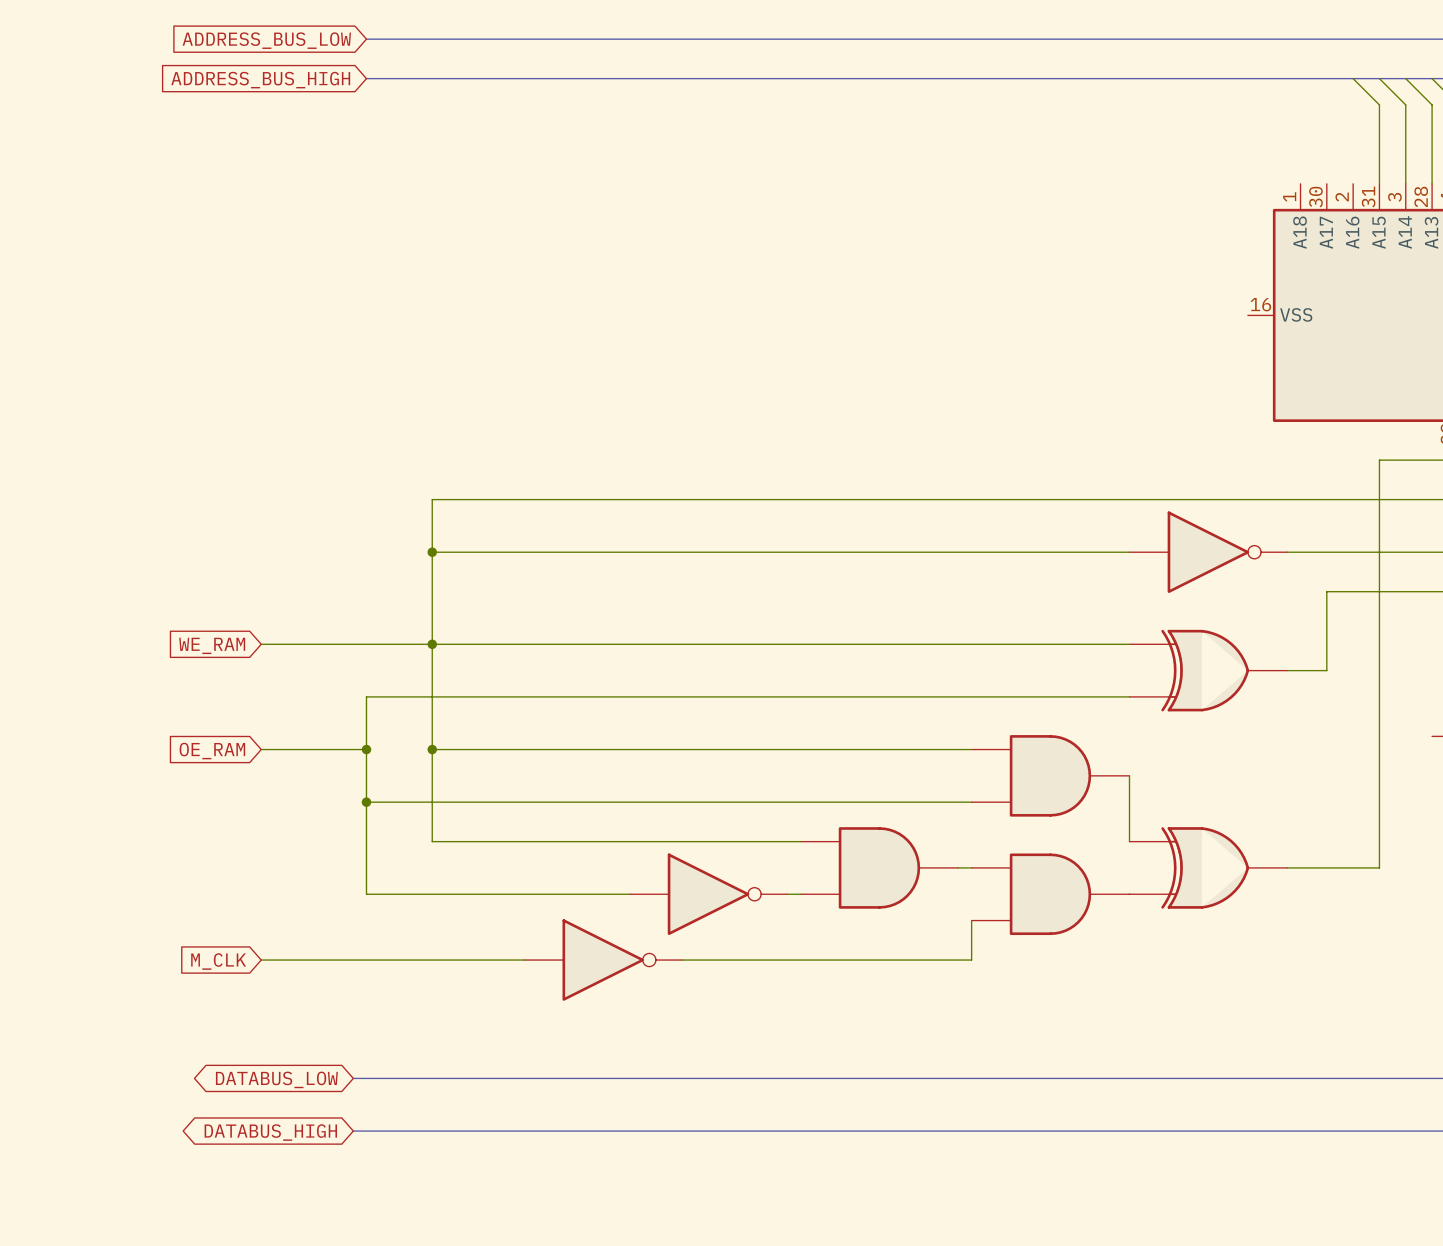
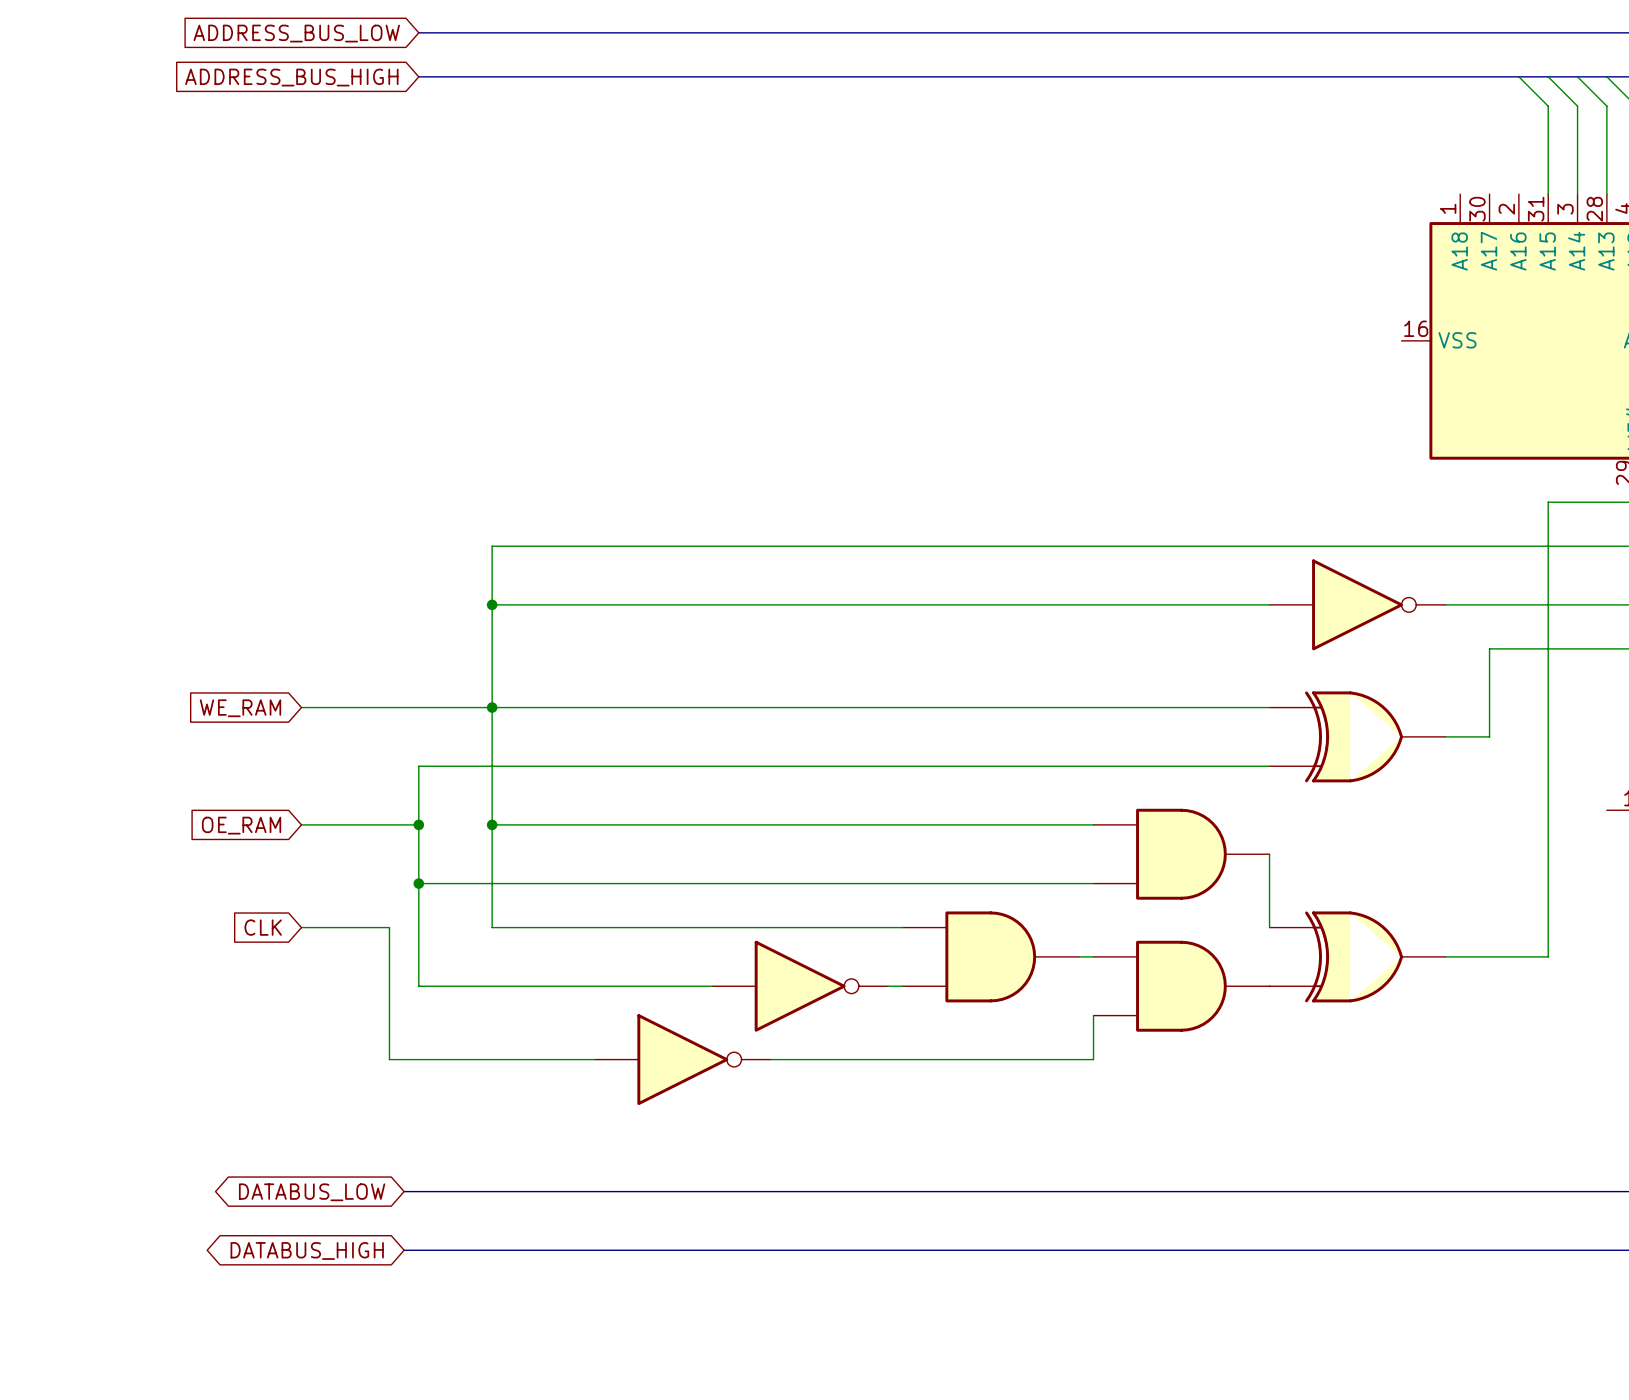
global label: none -> CLK (263, 927)
wire: (261, 960) (340, 960) -> (301, 927) (389, 927) (389, 1059)
global label: M_CLK (218, 961) -> none

